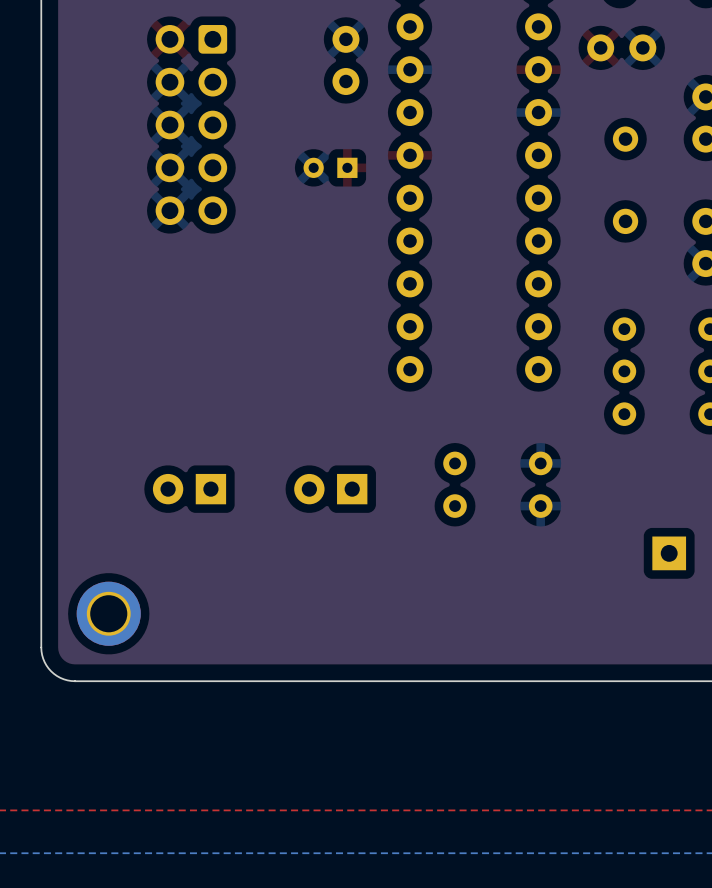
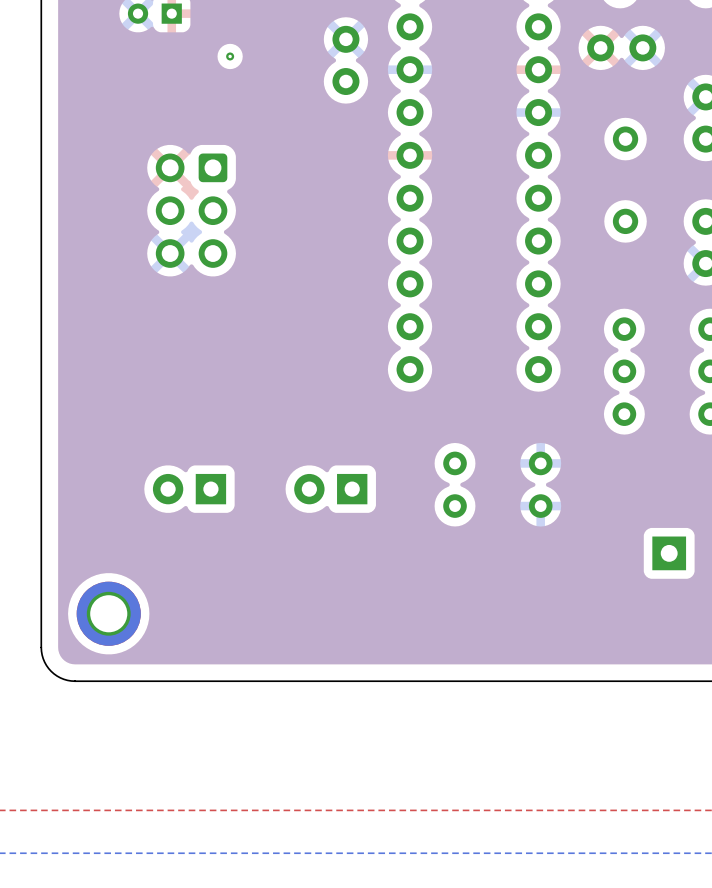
via: none -> (230, 56)
part: (191, 125) -> none
part position: (330, 167) -> (154, 13)
part: none -> (191, 210)

